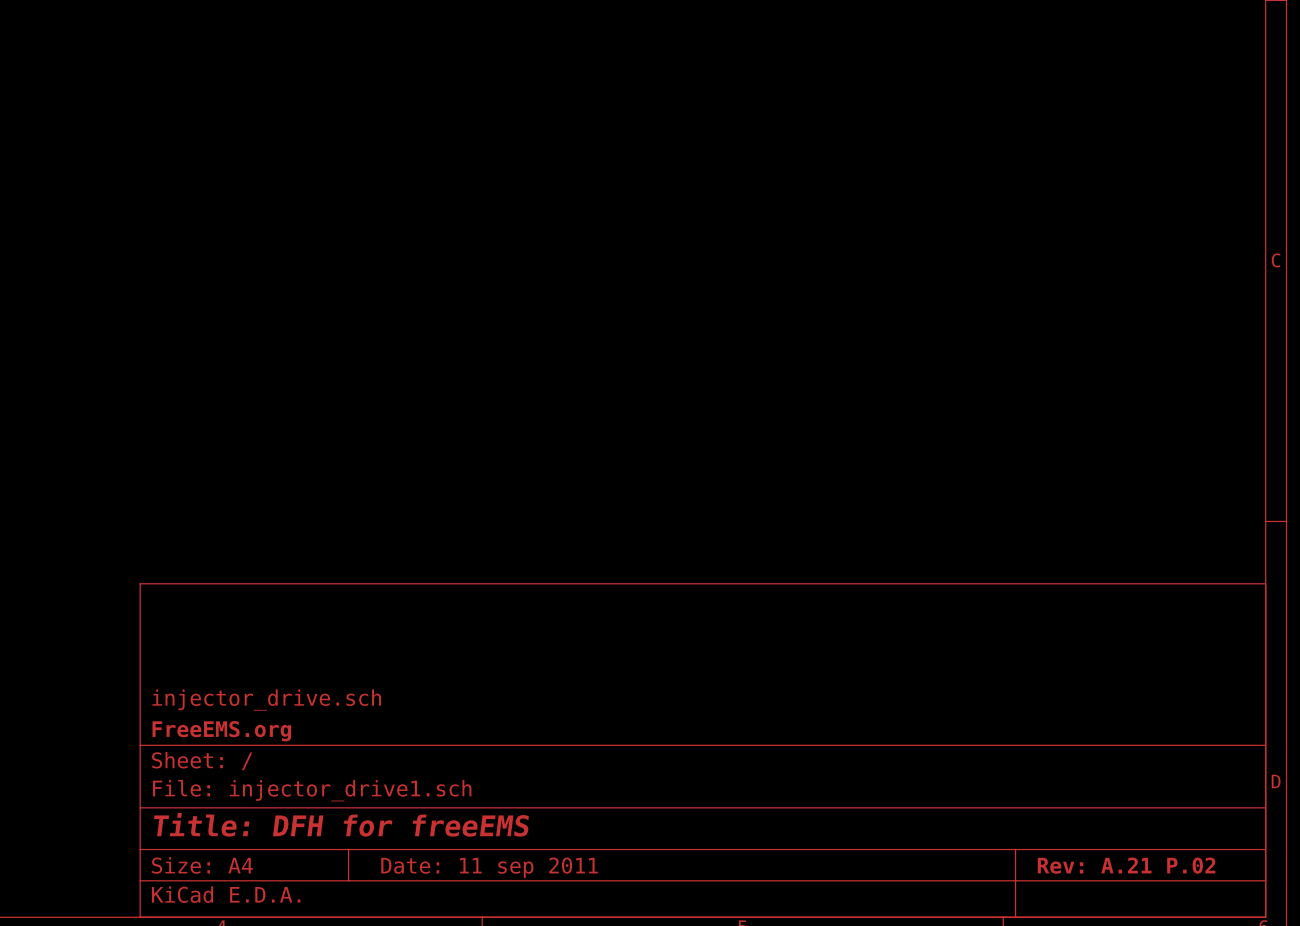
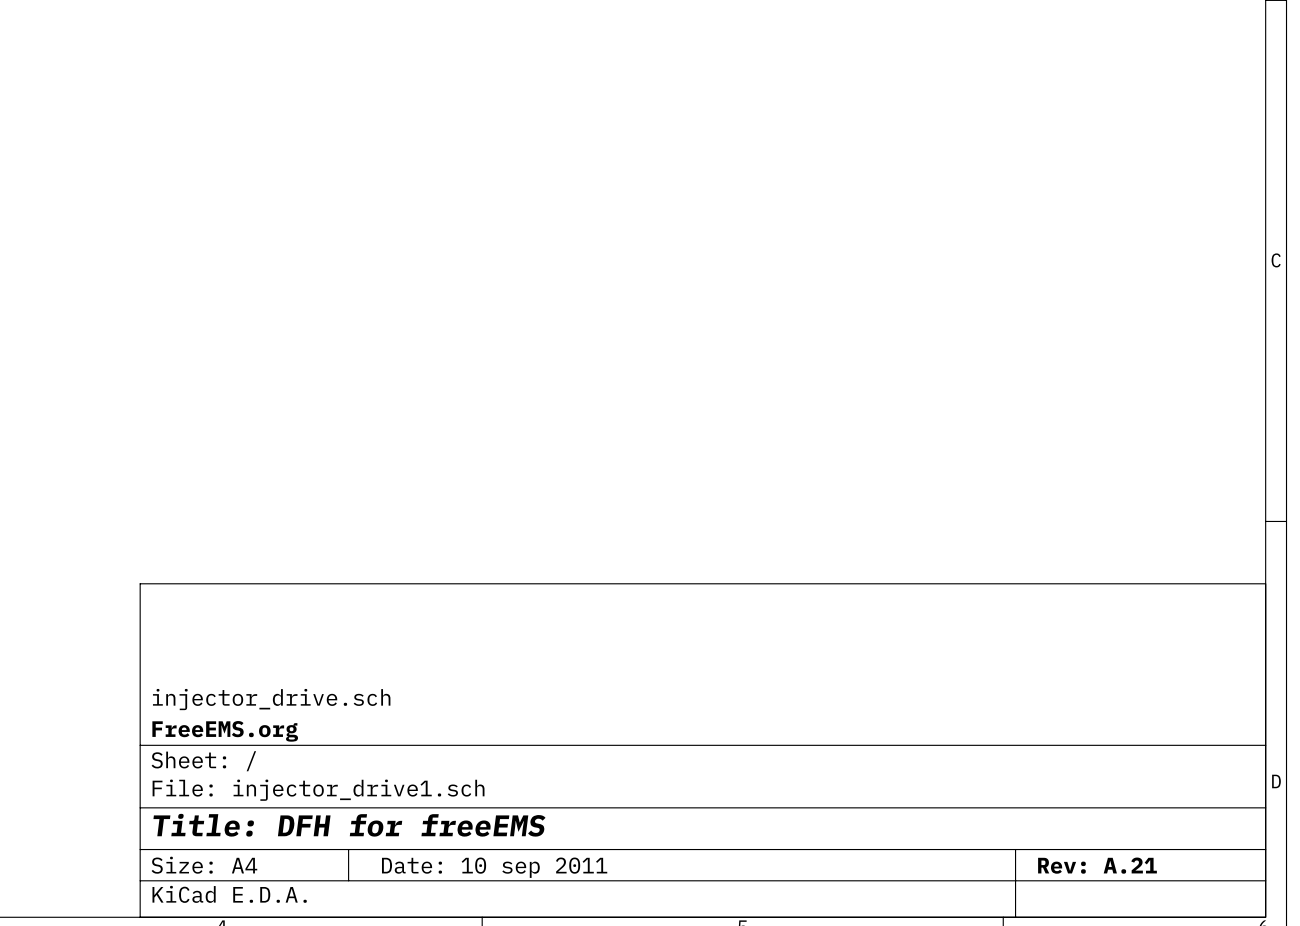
title block: Rev: A.21 P.02 (1126, 865) -> Rev: A.21 (1097, 865)
title block: Date: 11 sep 2011 (489, 867) -> Date: 10 sep 2011 (494, 867)

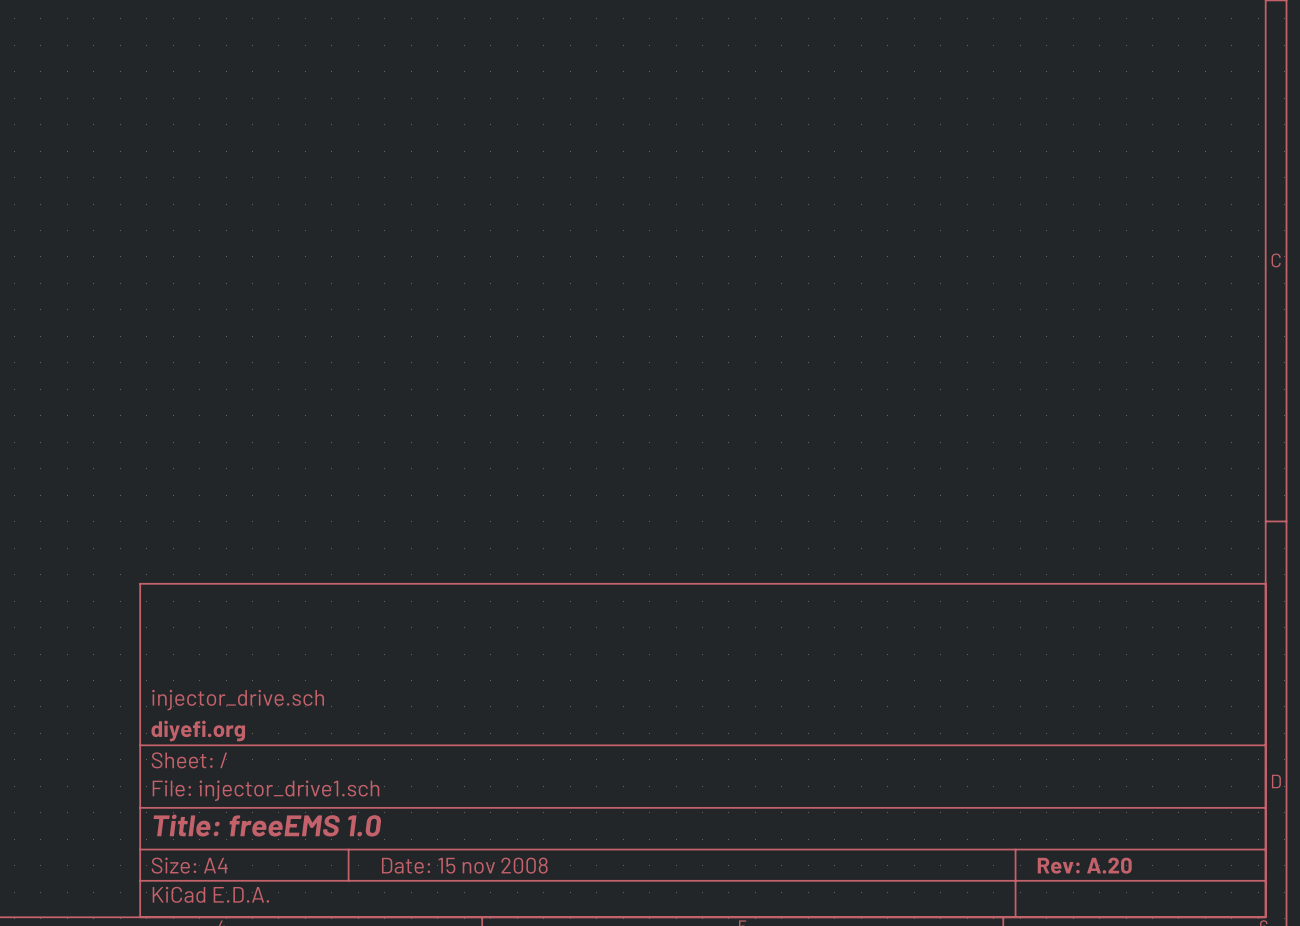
title block: FreeEMS.org (225, 731) -> diyefi.org (198, 730)
title block: Title: DFH for freeEMS (349, 825) -> Title: freeEMS 1.0 (267, 825)
title block: Rev: A.21 (1097, 865) -> Rev: A.20 (1084, 865)
title block: Date: 10 sep 2011 (494, 867) -> Date: 15 nov 2008 (464, 865)

